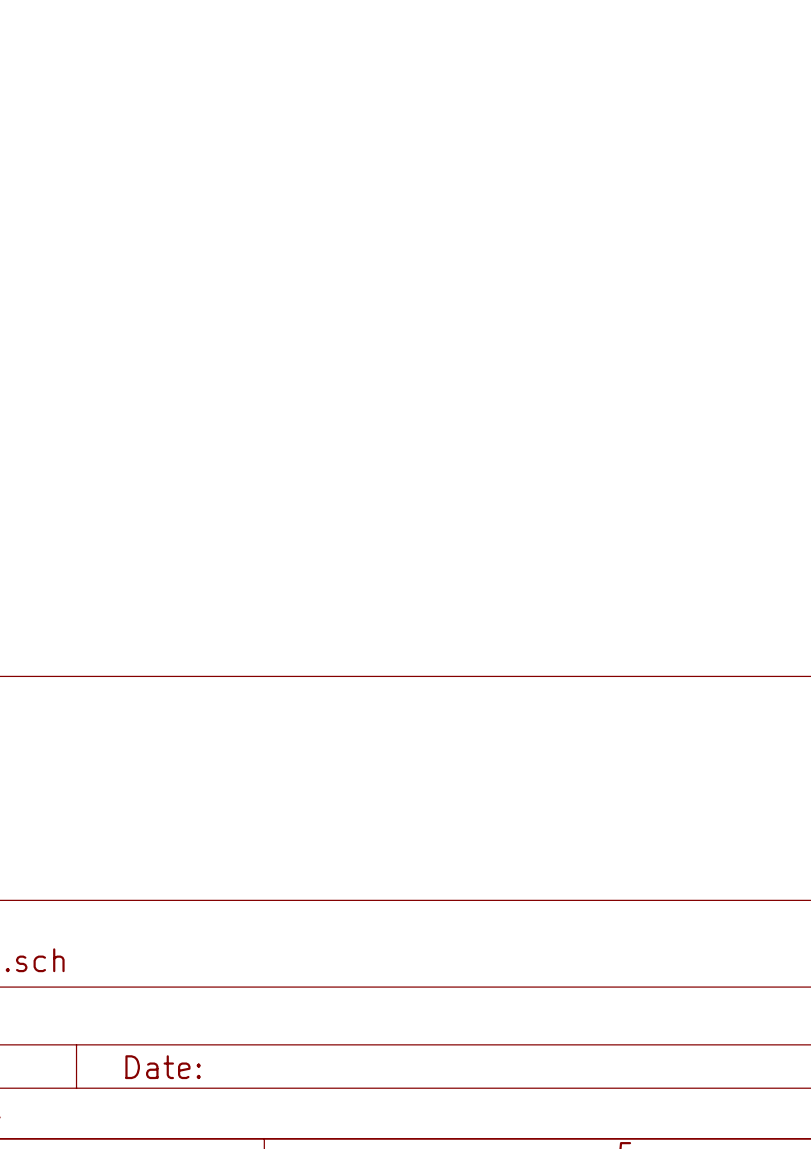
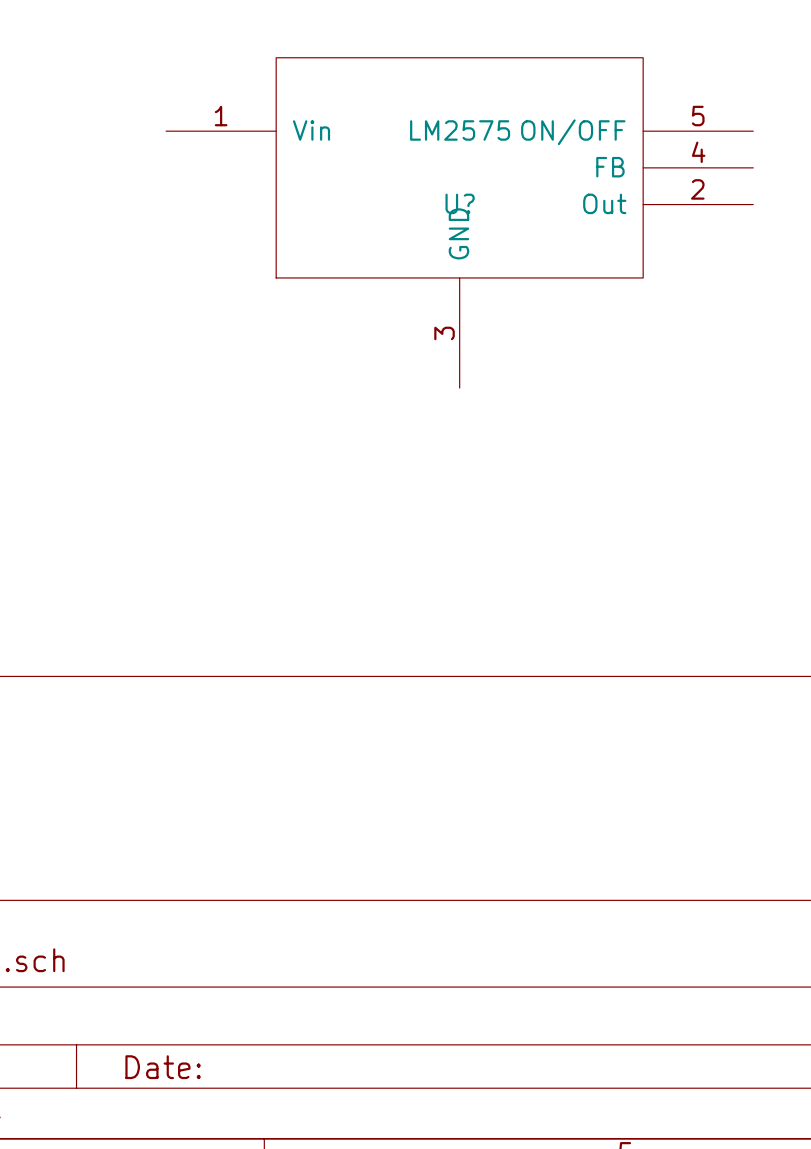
U?: none -> LM2575 (459, 222)

